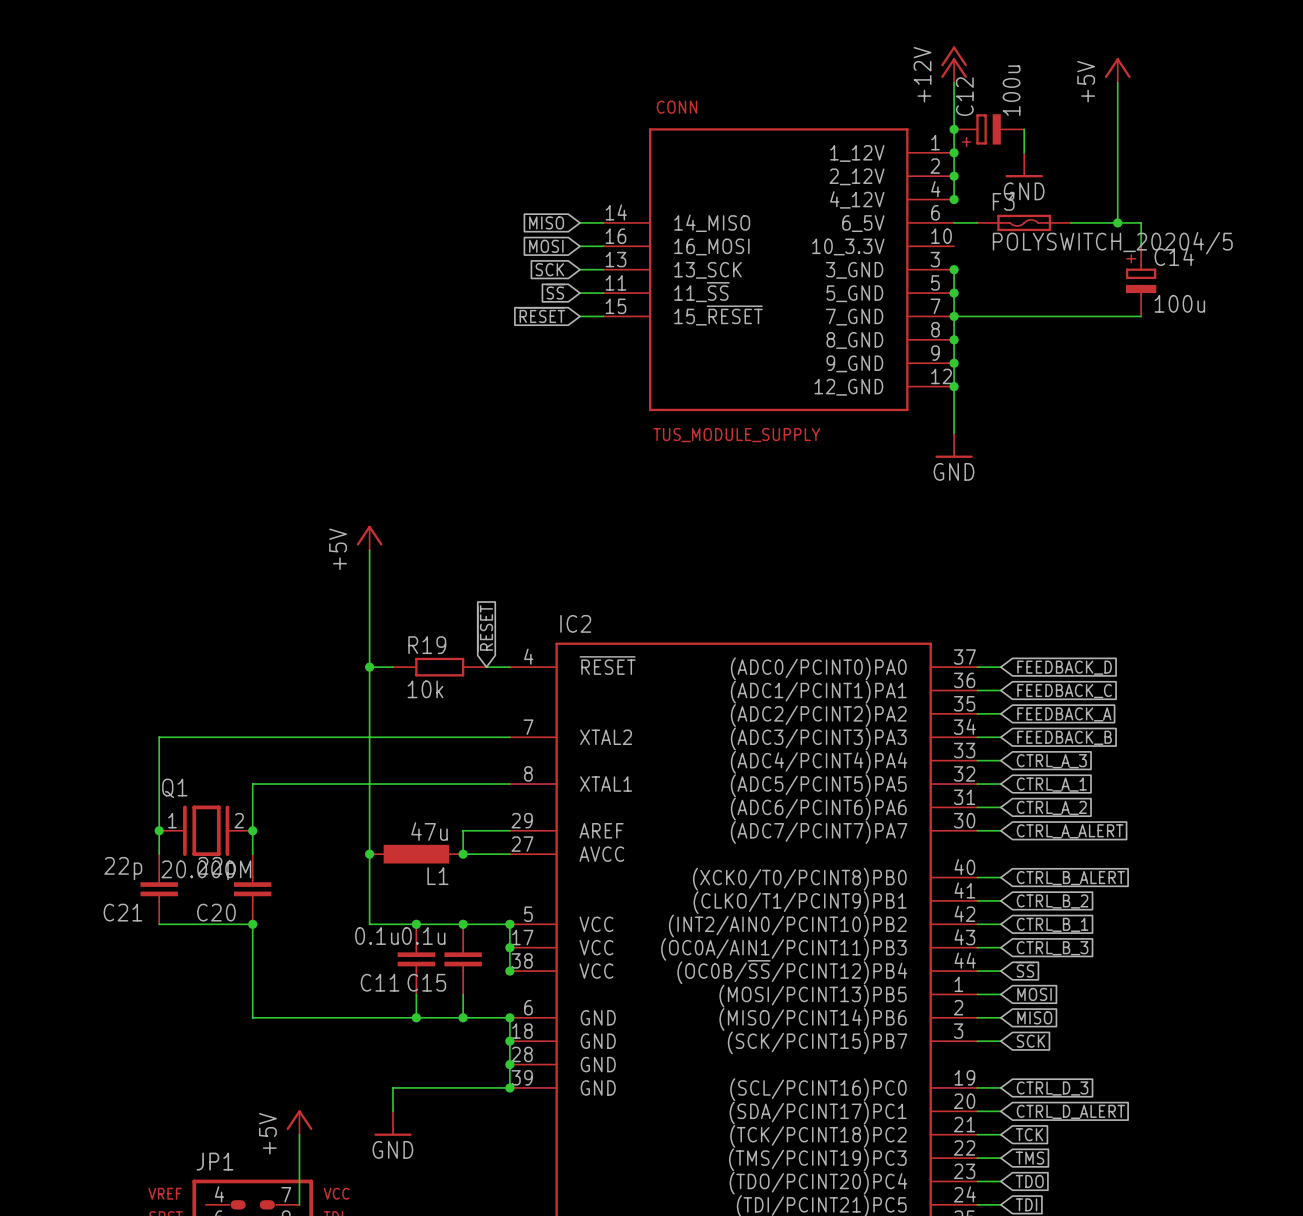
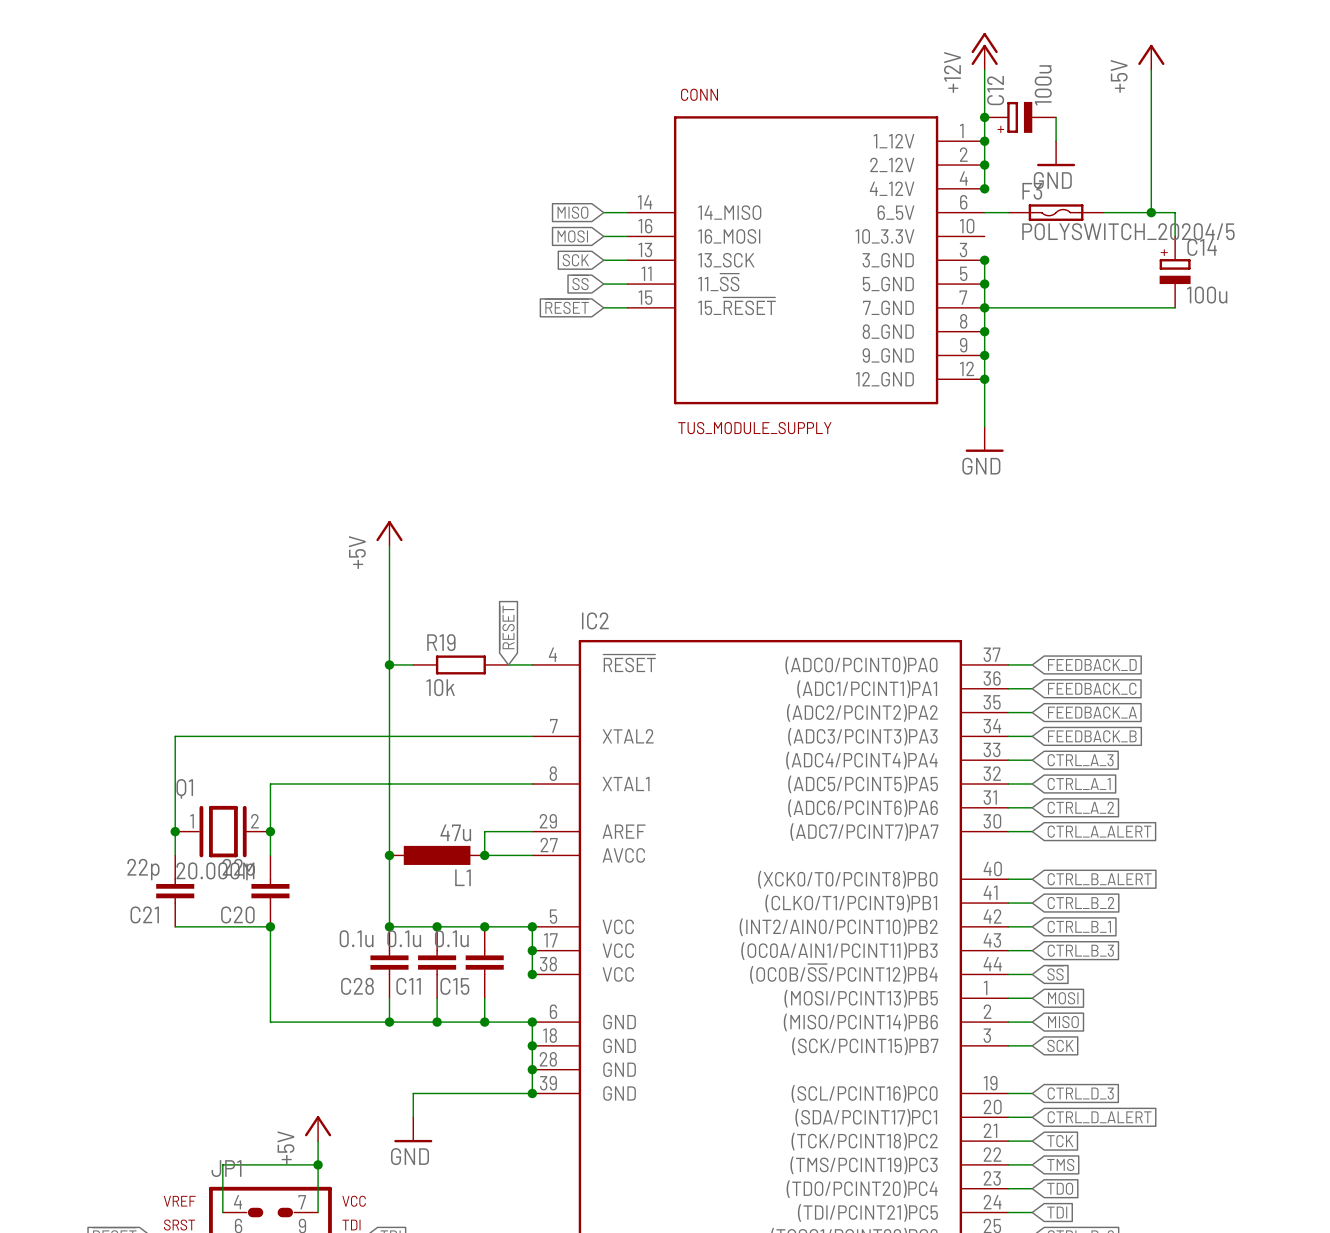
junction: none -> (389, 926)
C28: none -> 0.1u (389, 962)
wire: none -> (389, 998) (389, 1022)
junction: none -> (389, 1022)
wire: none -> (318, 1164) (222, 1164) (222, 1212)
junction: none -> (318, 1164)

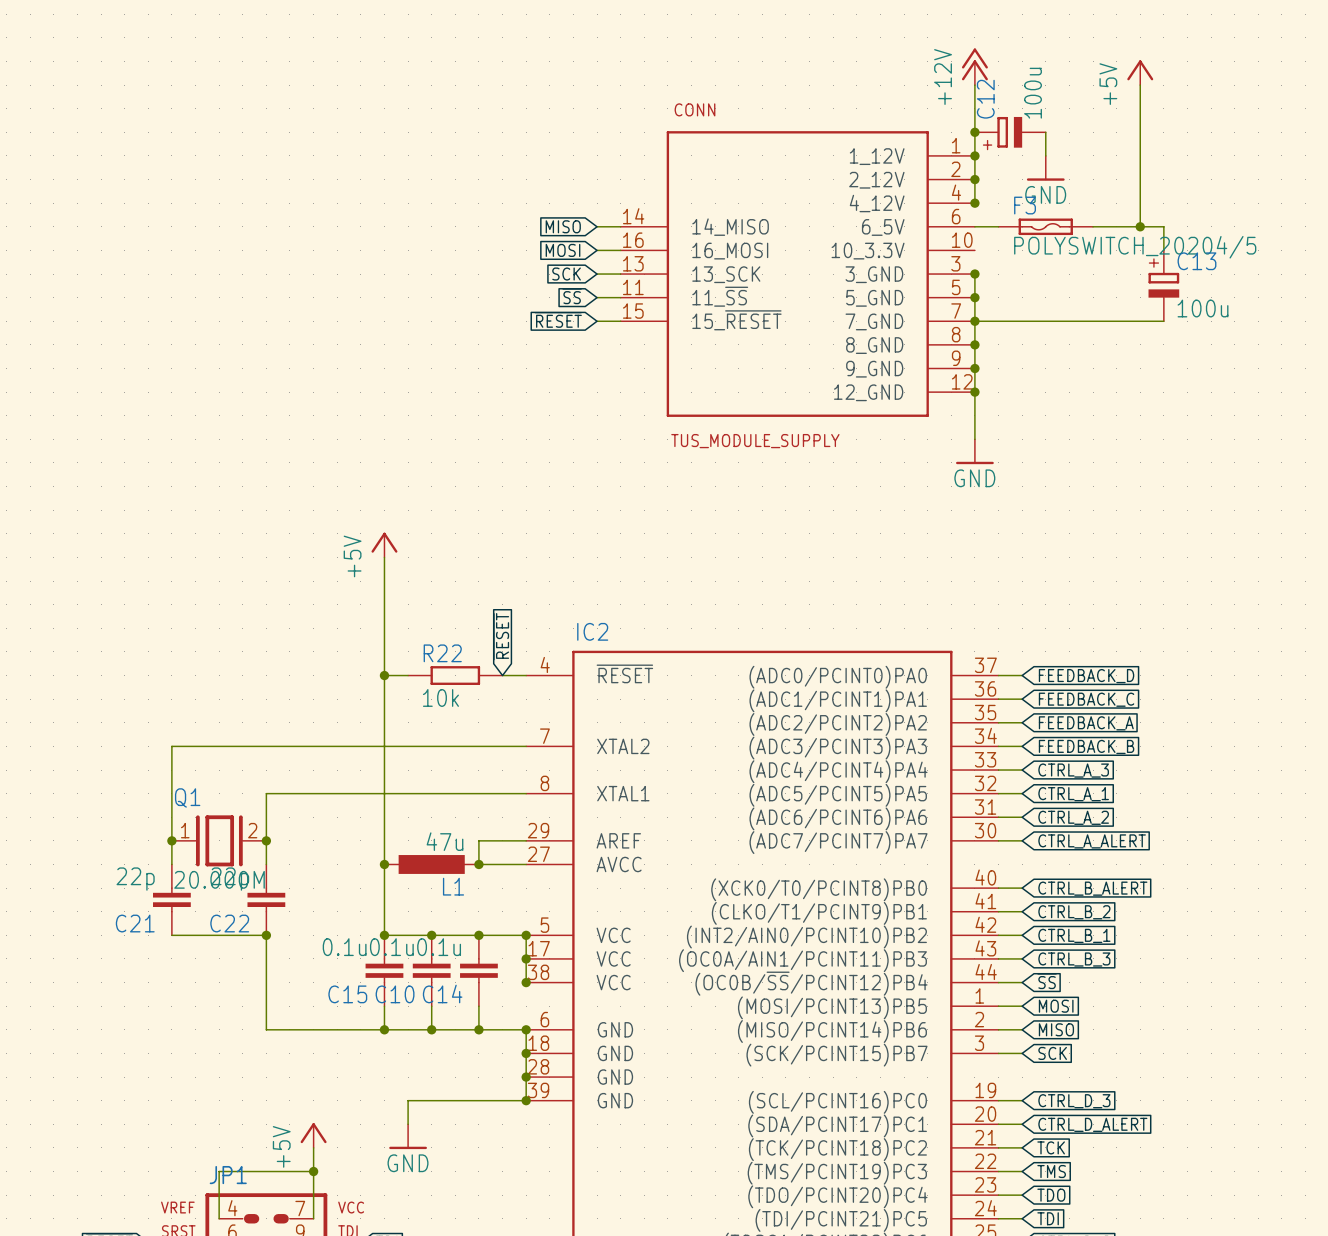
C14 name: C14 (1202, 247) -> C13 (1196, 261)
R19 name: R19 (441, 642) -> R22 (442, 653)
C20 name: C20 (237, 914) -> C22 (229, 923)
C28 name: C28 (357, 986) -> C15 (347, 994)
C11 name: C11 (408, 986) -> C10 (395, 994)
C15 name: C15 (454, 986) -> C14 (442, 993)

